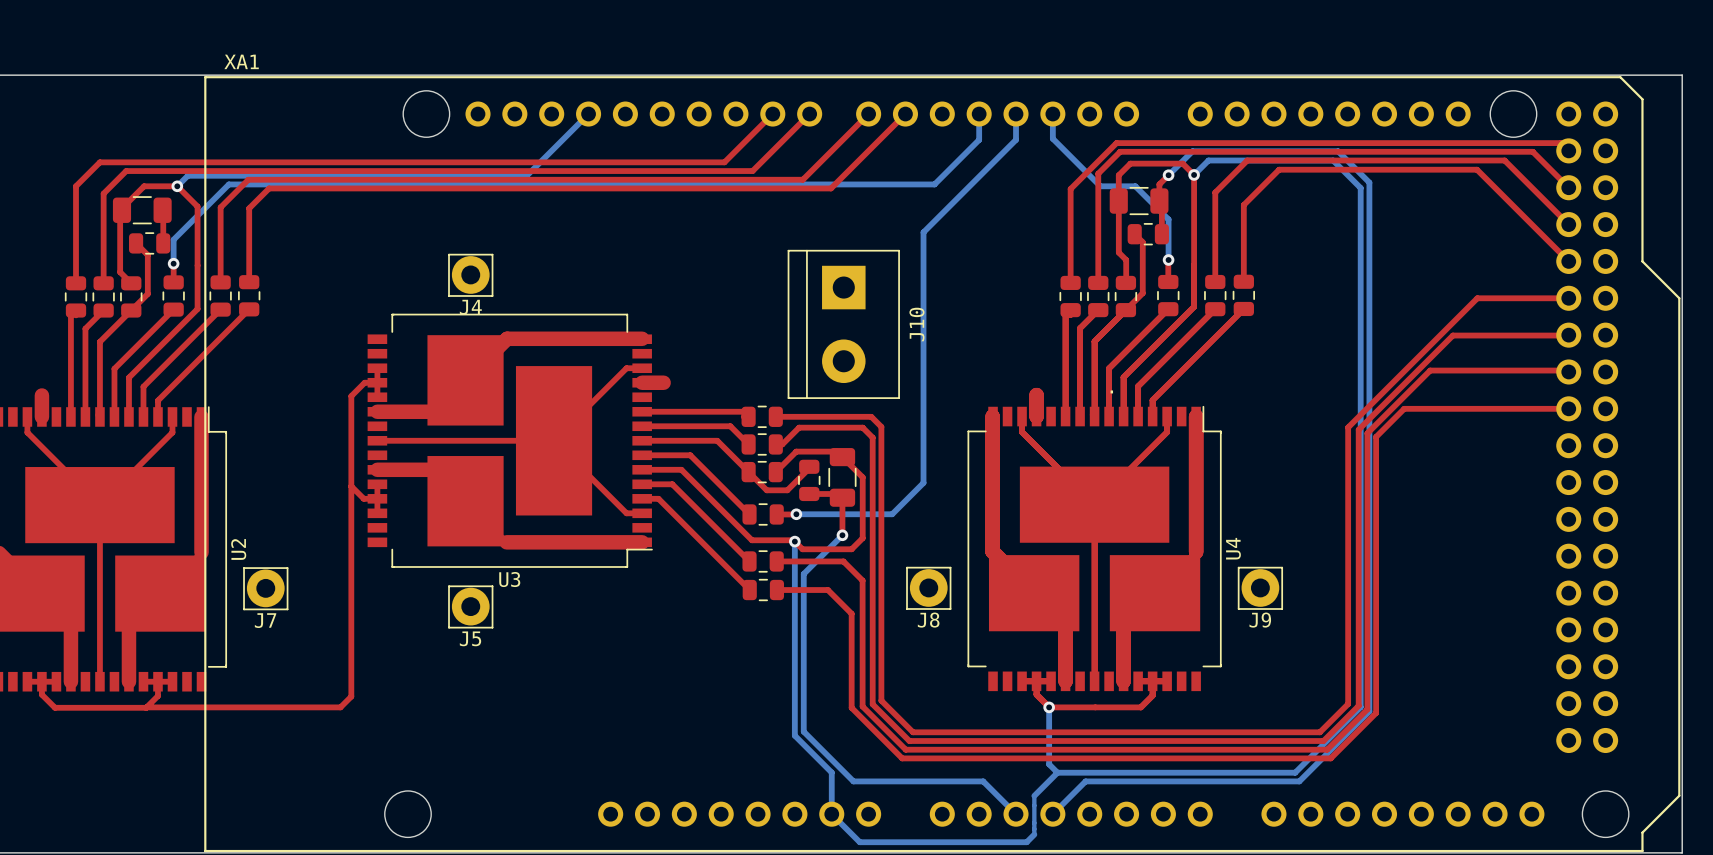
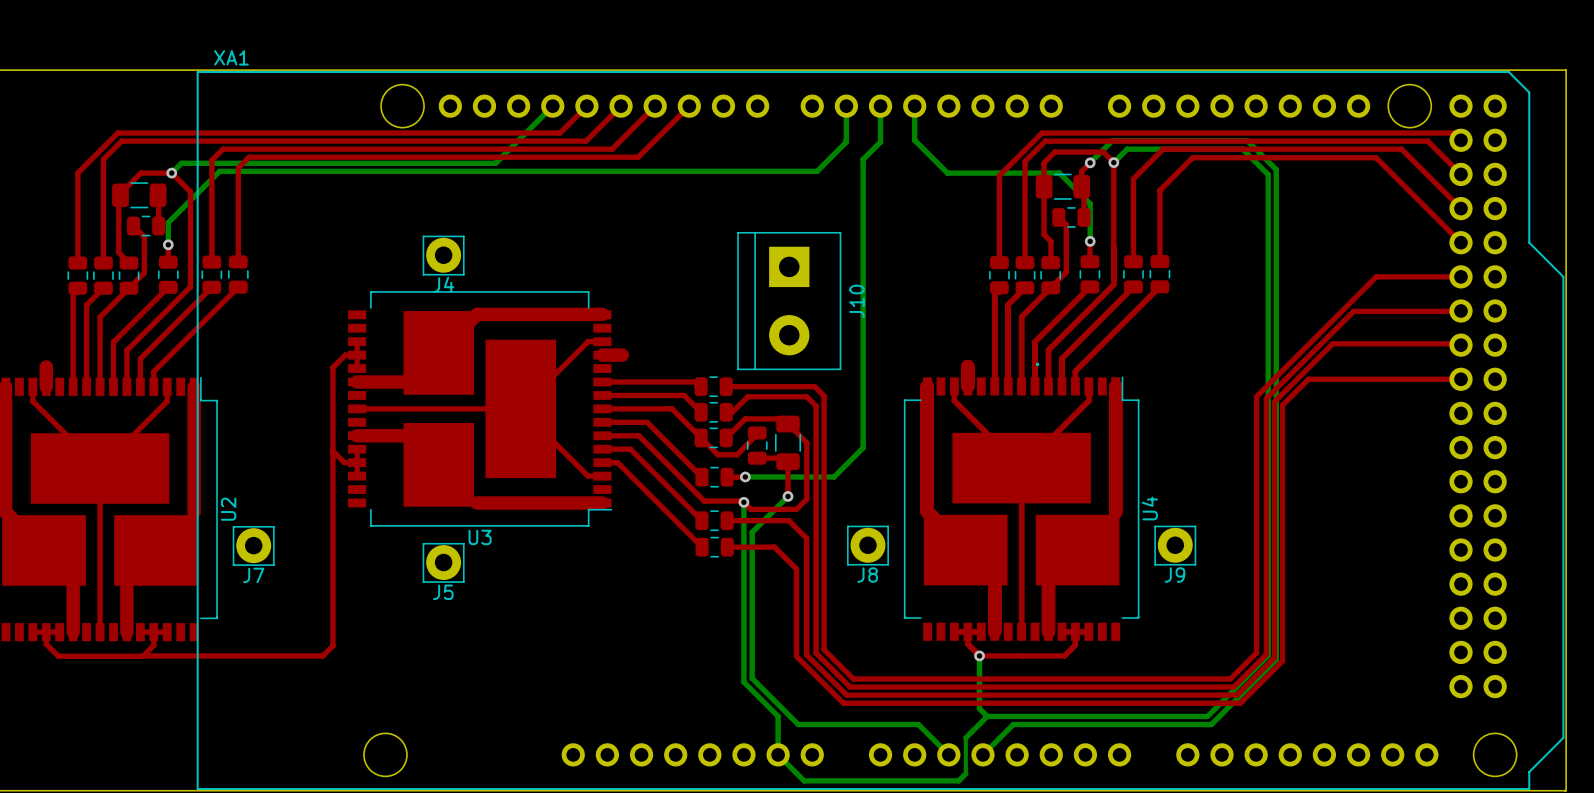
top track: (772, 114) (724, 162) (99, 162) -> (586, 106) (560, 133) (117, 133) (100, 150)
top track: (809, 114) (752, 171) (126, 171) (103, 193) -> (621, 106) (586, 141) (121, 141) (103, 159) (103, 179)
top track: (868, 114) (802, 179) (248, 179) (220, 207) -> (655, 106) (612, 149) (222, 149) (211, 160) (211, 192)
top track: (905, 114) (831, 188) (269, 188) (249, 208) -> (689, 106) (638, 157) (249, 157) (238, 167) (238, 193)
bottom track: (1016, 114) (1016, 139) (923, 232) -> (880, 106) (880, 142) (863, 159) (863, 215)
bottom track: (1052, 114) (1052, 138) (1100, 186) -> (914, 130) (914, 140) (947, 173) (1027, 173)
bottom track: (979, 139) (934, 184) (873, 184) -> (846, 106) (846, 142) (817, 171)

